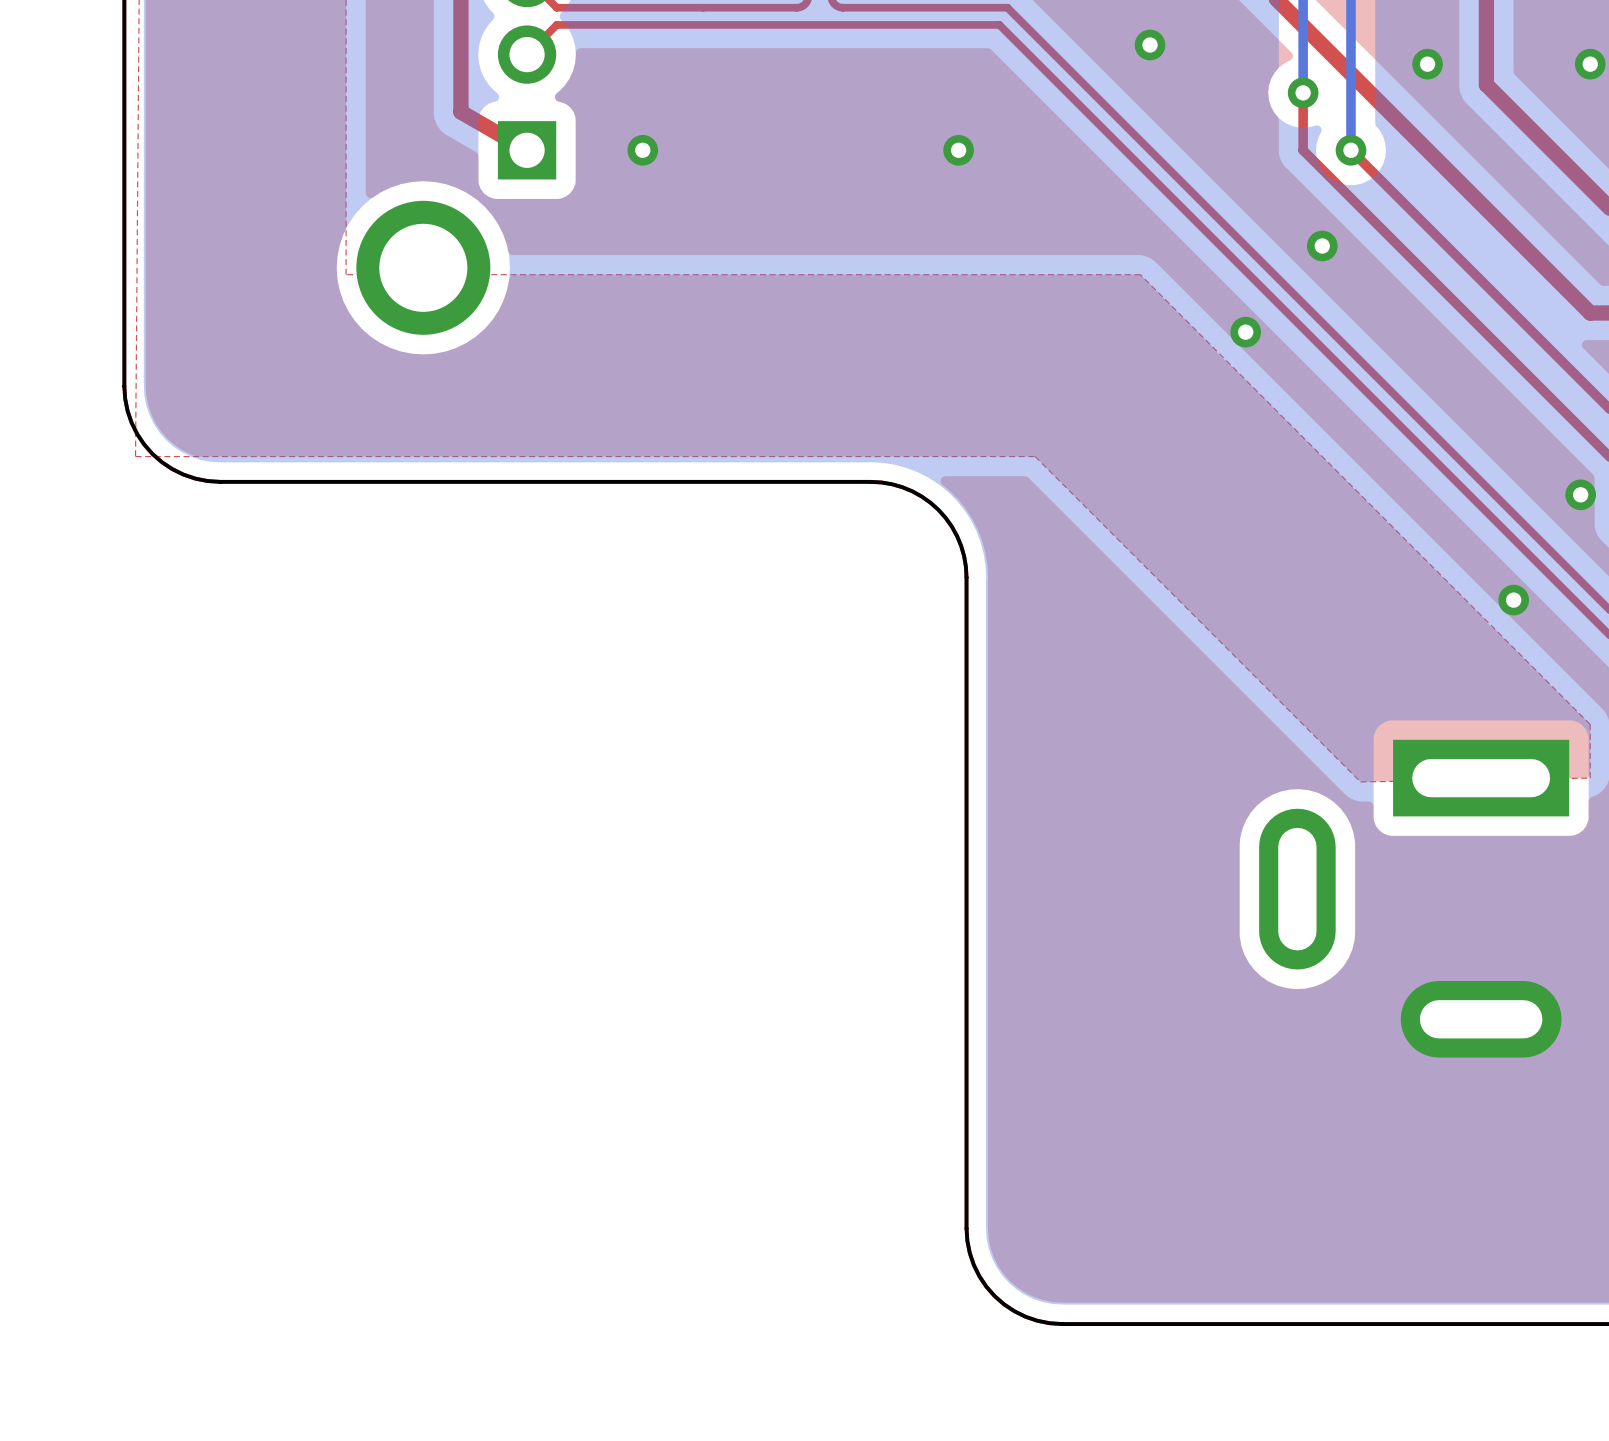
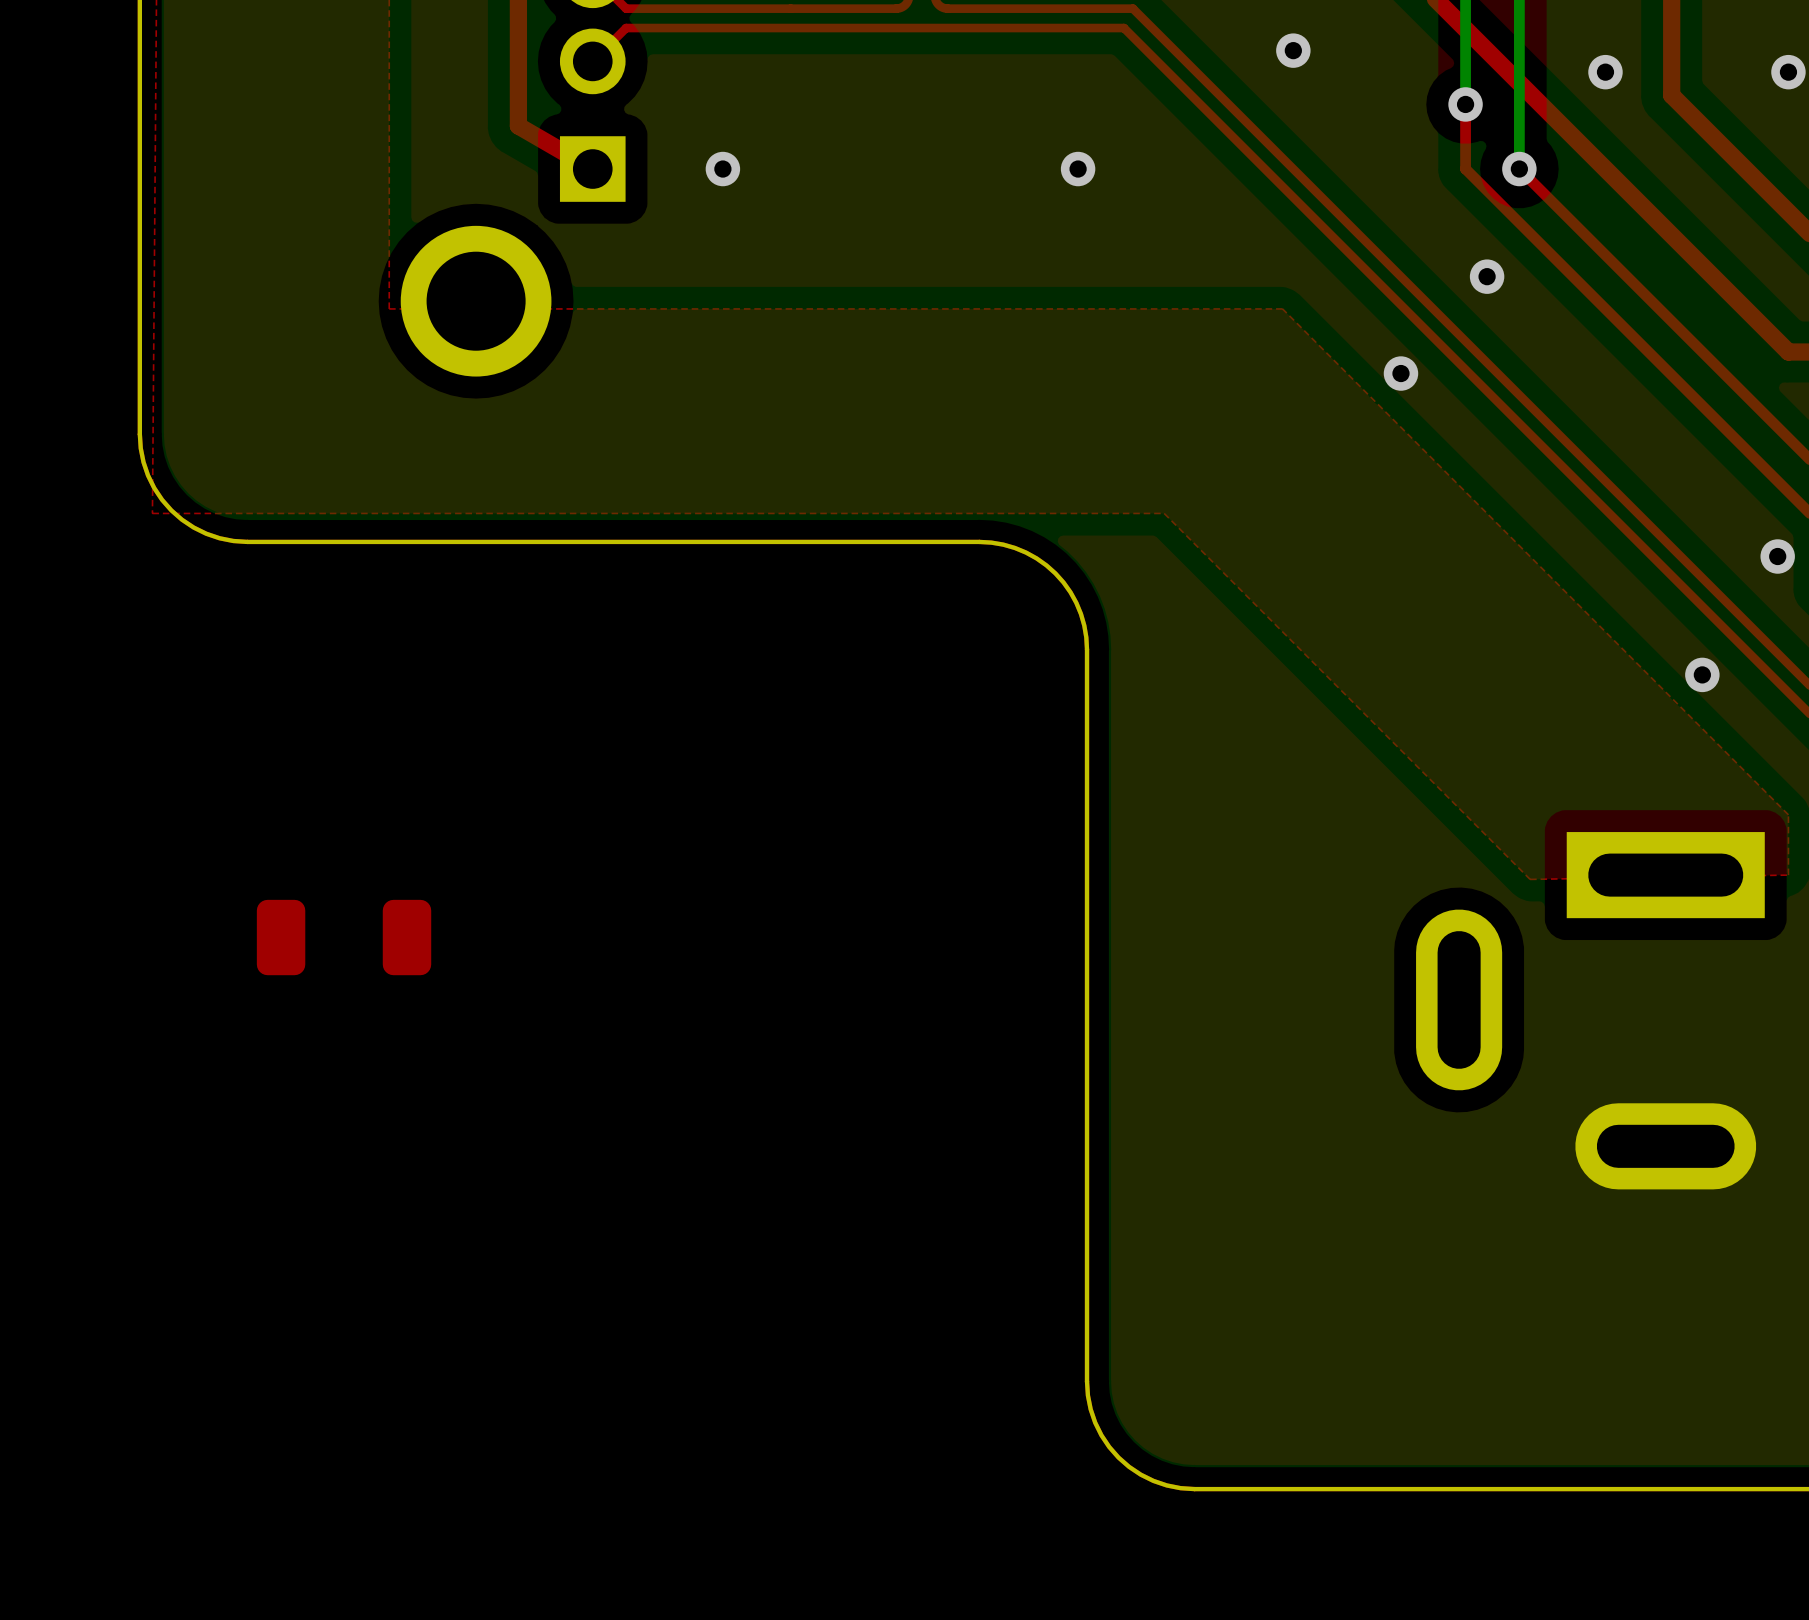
part: none -> (344, 937)

